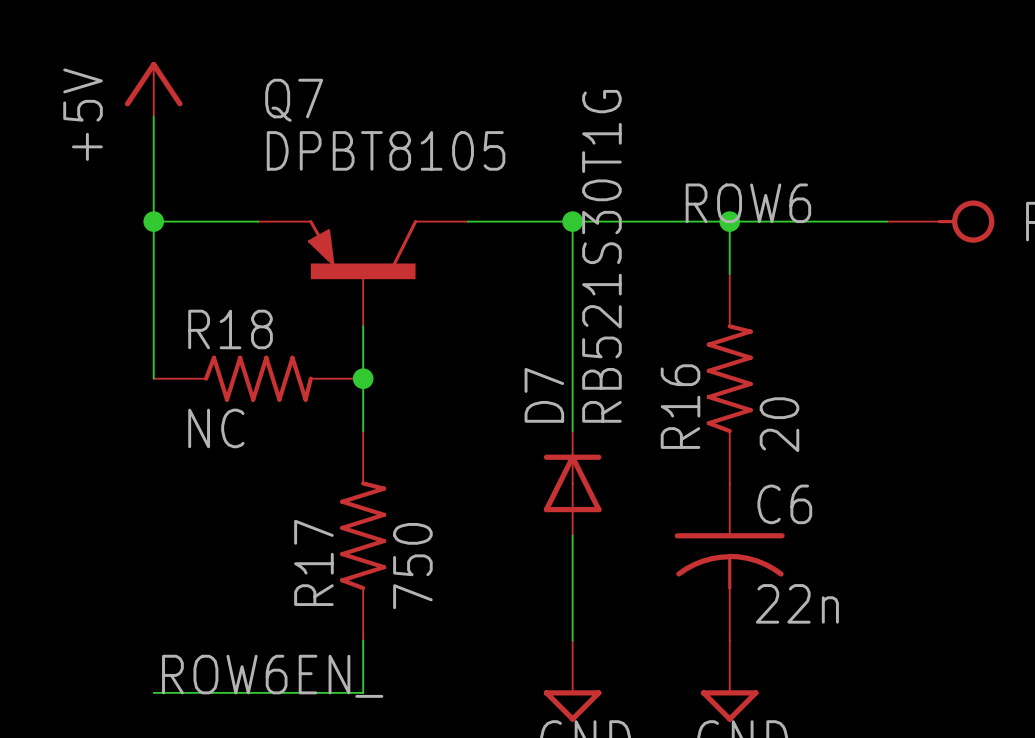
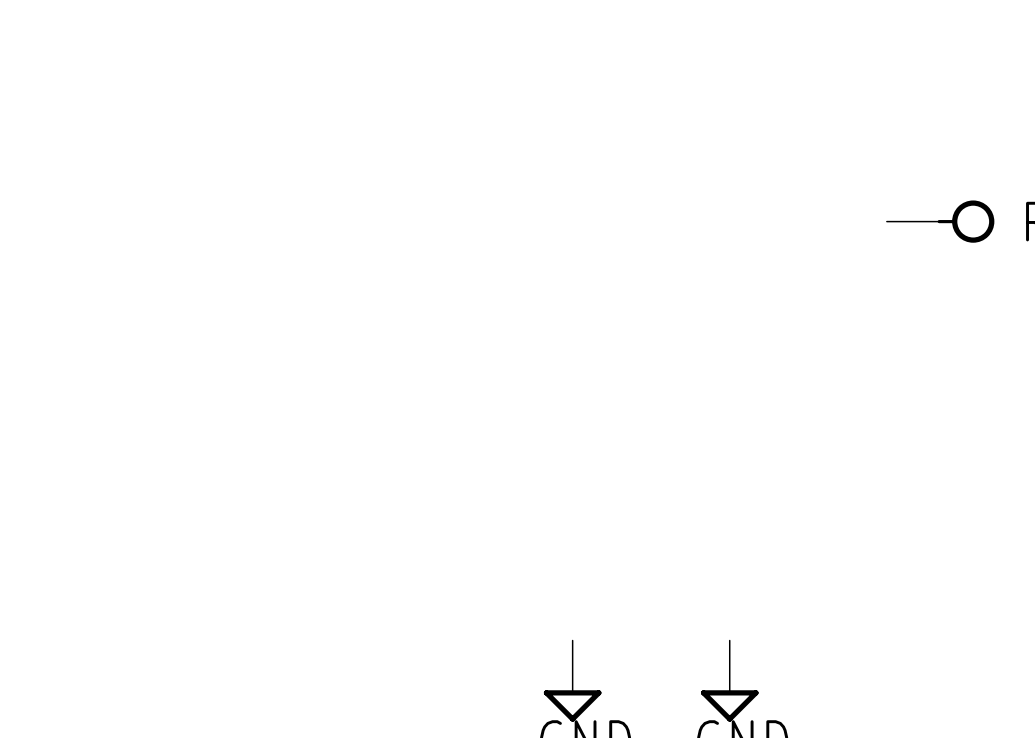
power symbol: +5V (153, 89) -> none
wire: (153, 116) (153, 378) -> none
label: ROW6 (748, 203) -> none
wire: (153, 221) (258, 221) -> none
junction: (153, 221) -> none
wire: (467, 221) (886, 221) -> none
wire: (572, 221) (572, 431) -> none
junction: (572, 221) -> none
wire: (729, 221) (729, 273) -> none
junction: (729, 221) -> none
Q7: DPBT8105 (363, 273) -> none
wire: (363, 326) (363, 431) -> none
R18: NC (258, 378) -> none
junction: (363, 378) -> none
R16: 20 (729, 378) -> none
D7: RB521S30T1G (572, 483) -> none
R17: 750 (363, 535) -> none
wire: (572, 535) (572, 640) -> none
C6: 22n (729, 561) -> none
wire: (363, 640) (363, 692) (153, 692) -> none
label: ROW6EN_ (272, 676) -> none

